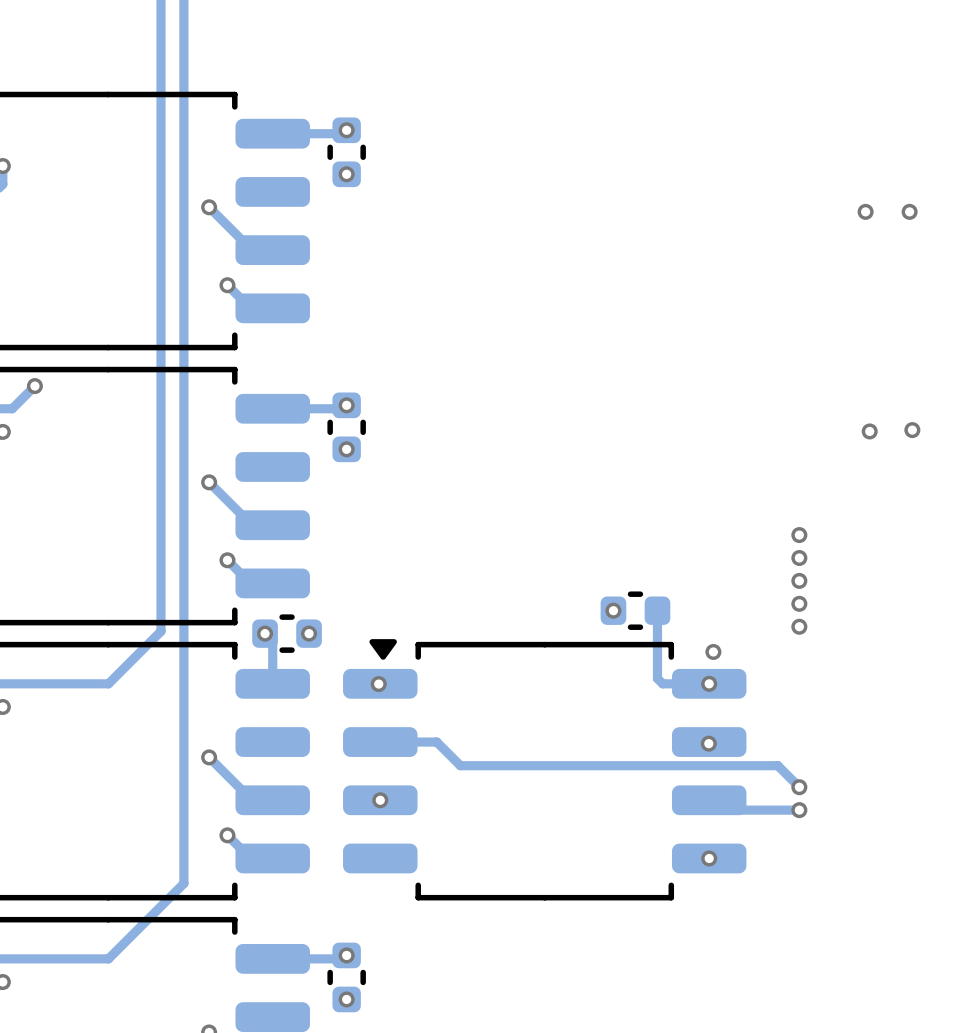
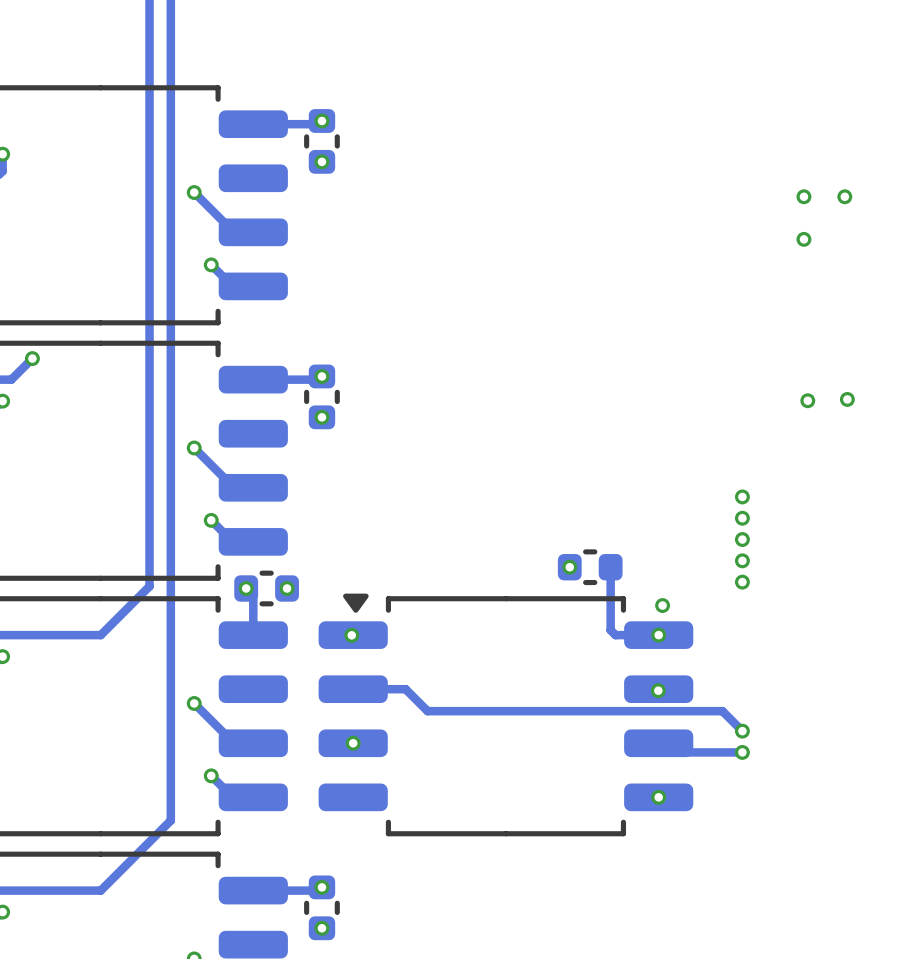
via: none -> (803, 239)

